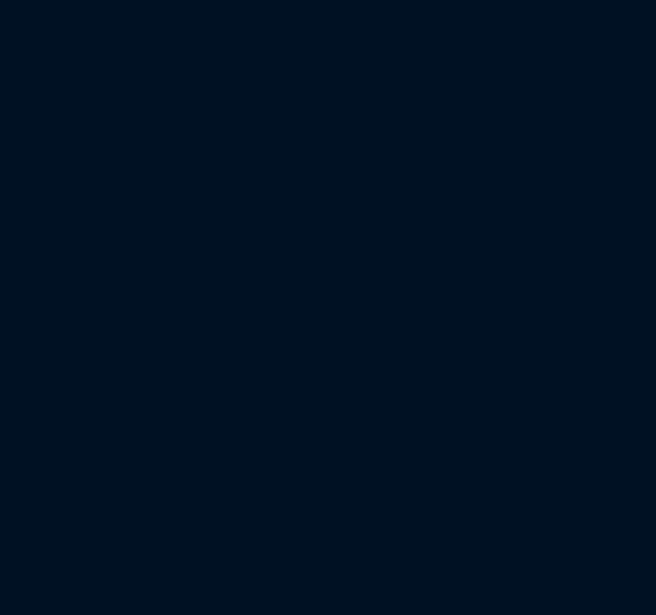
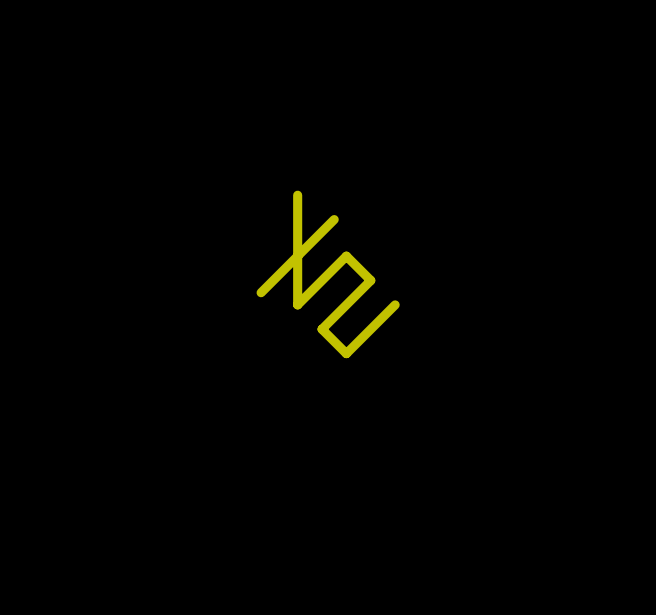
board edge: none -> (297, 195) (297, 304) (346, 256) (370, 280) (322, 329) (346, 353) (395, 304)
board edge: none -> (334, 219) (261, 292)

